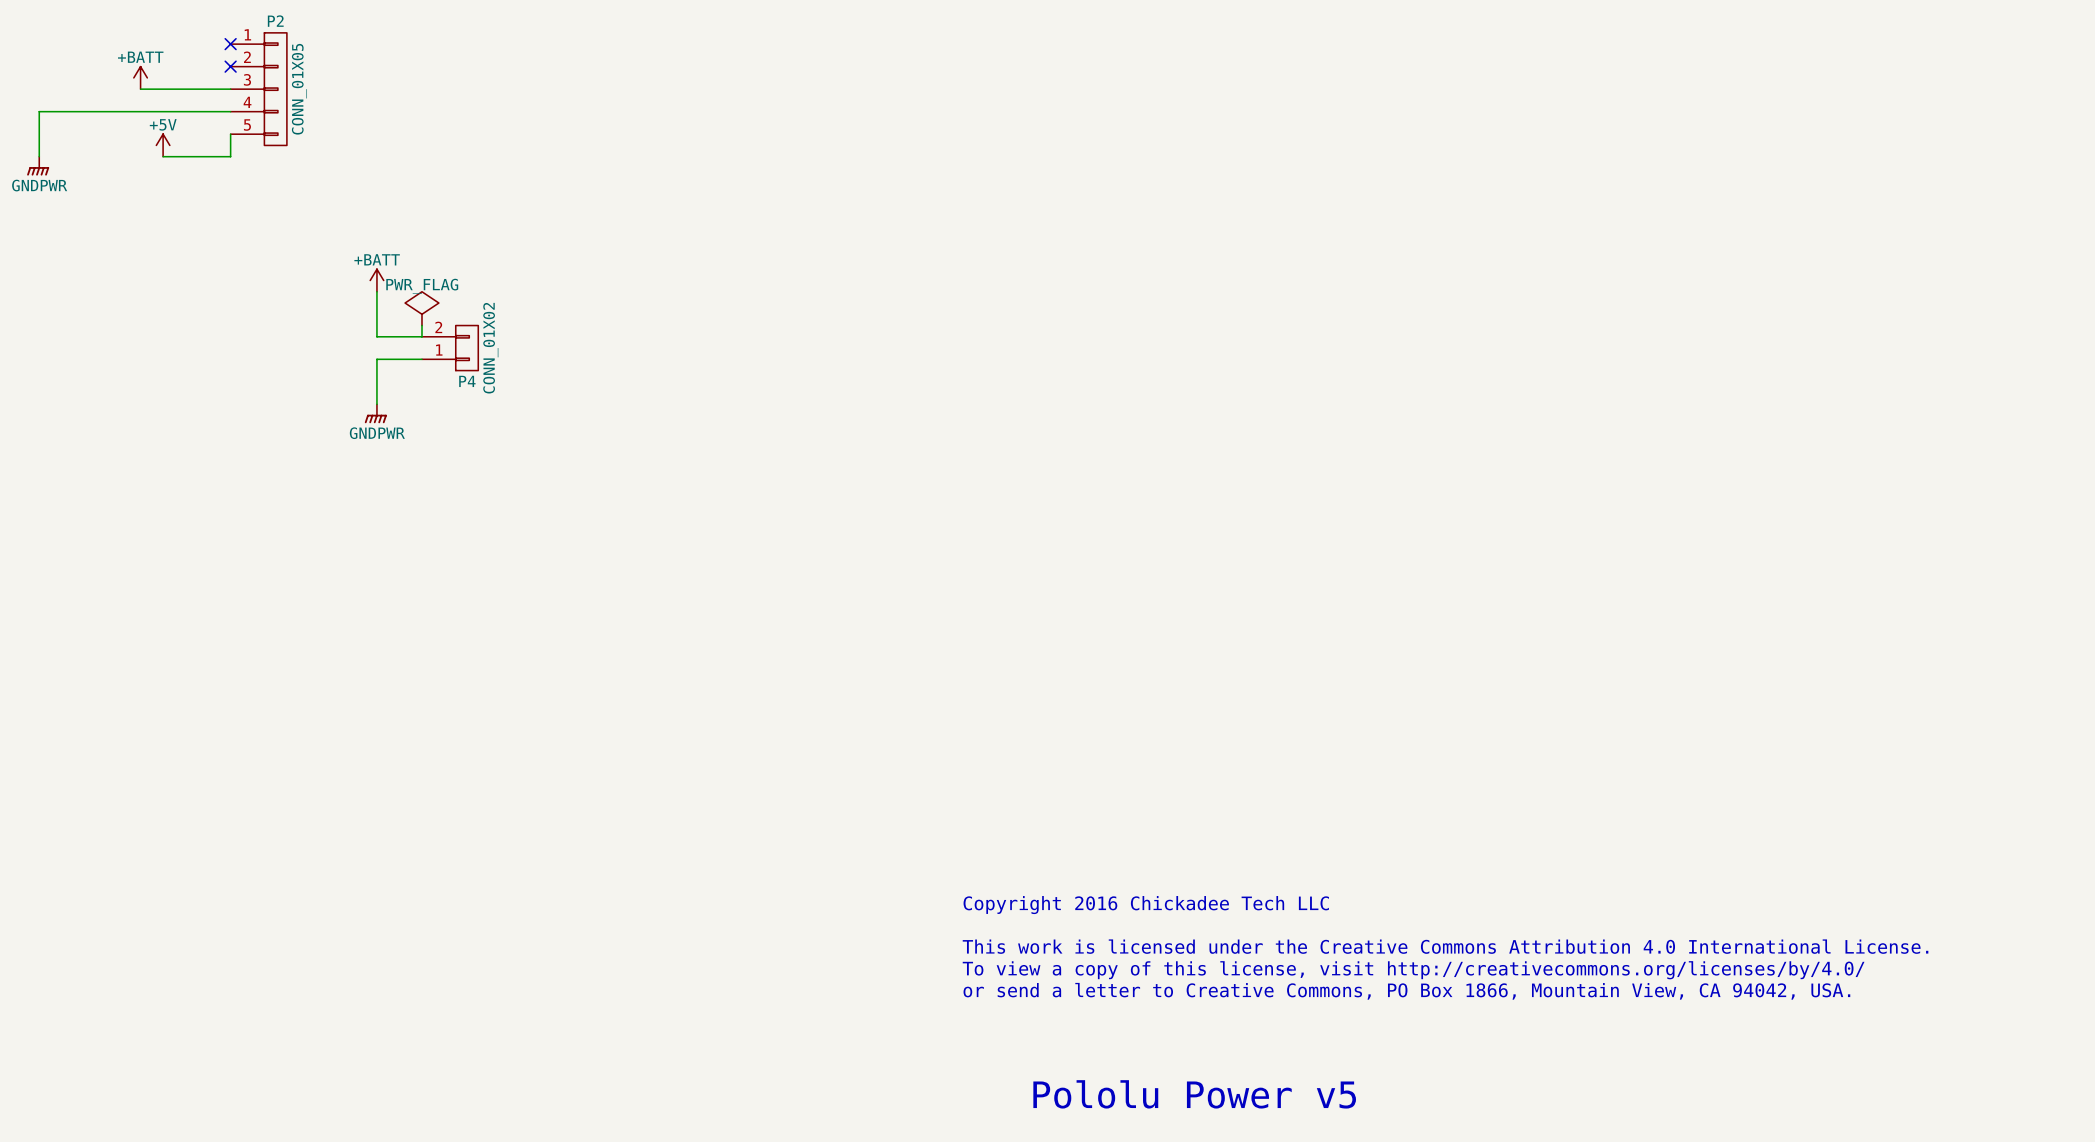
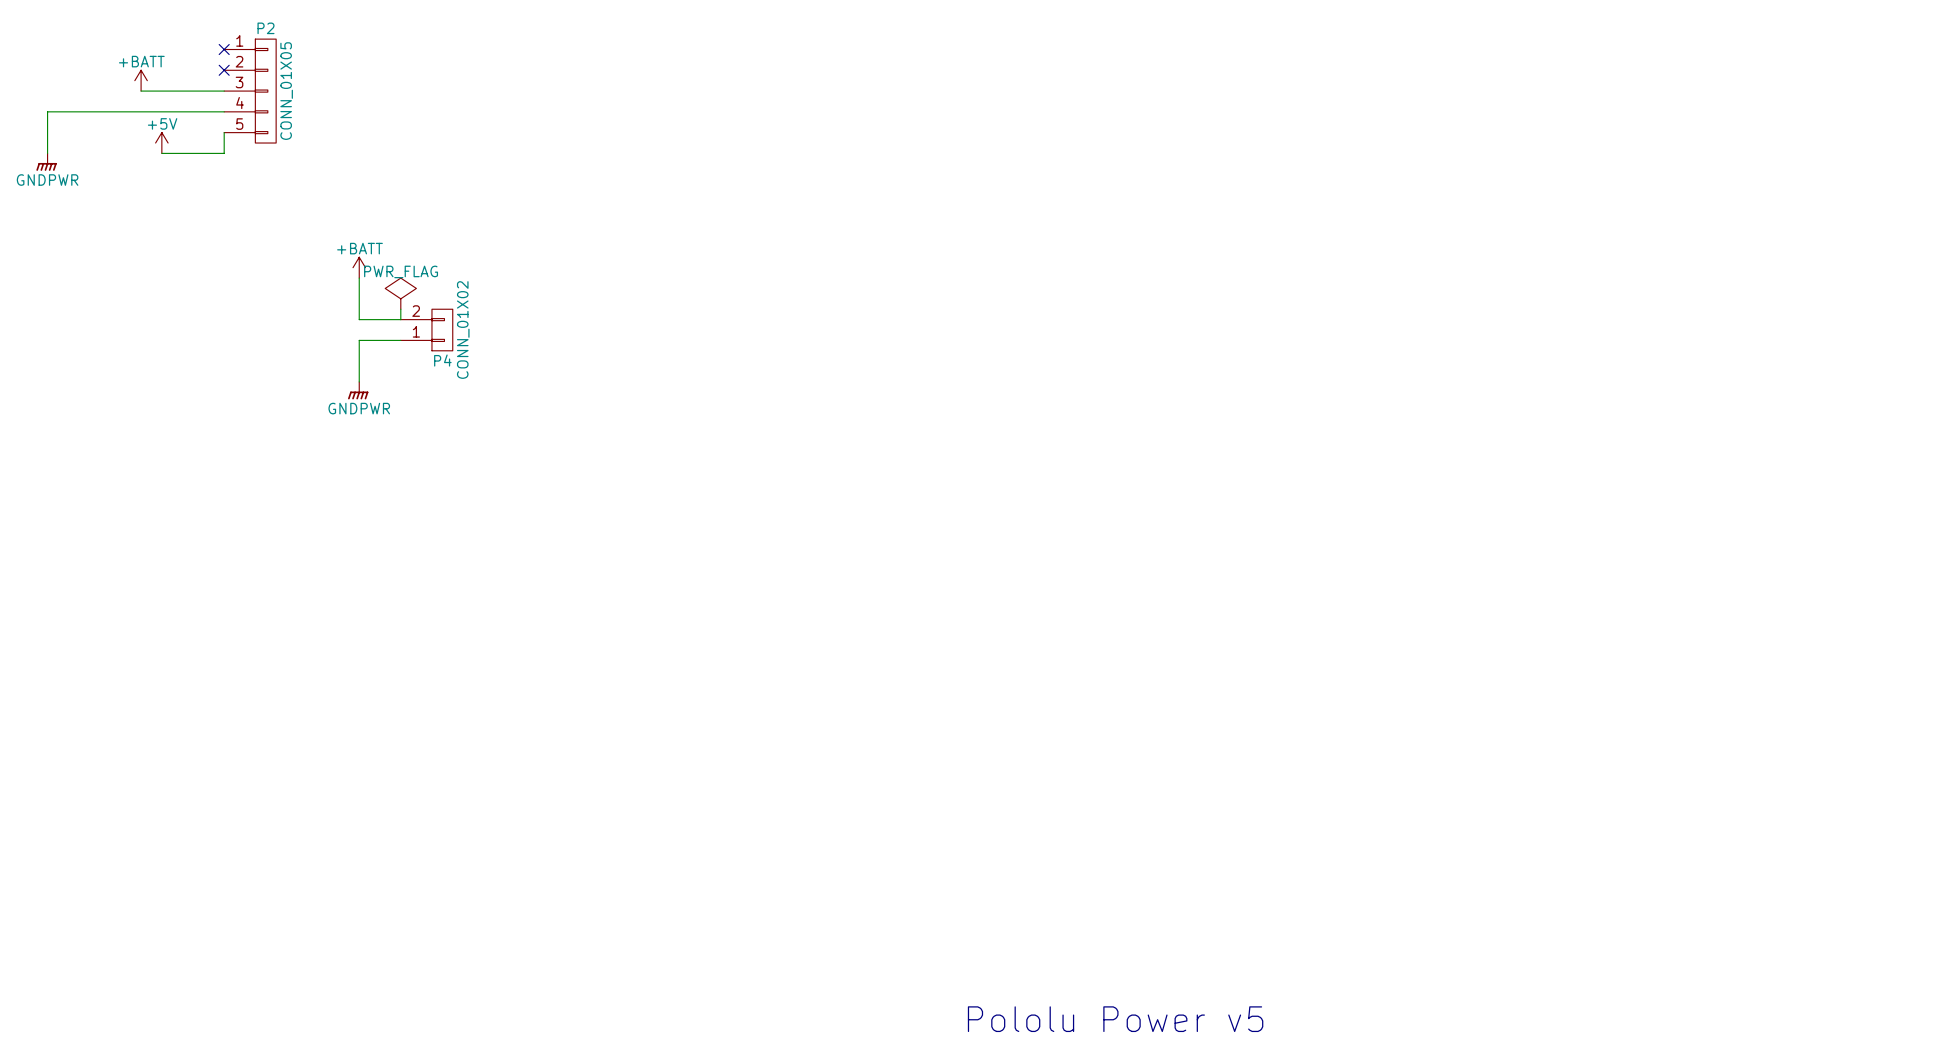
text: Copyright 2016 Chickadee Tech LLC (1146, 905) -> none
text: This work is licensed under the Creative Commons Attribution 4.0 International License. (1445, 946) -> none
text: To view a copy of this license, visit http://creativecommons.org/licenses/by/4.0/ (1413, 970) -> none
text: or send a letter to Creative Commons, PO Box 1866, Mountain View, CA 94042, USA. (1406, 991) -> none

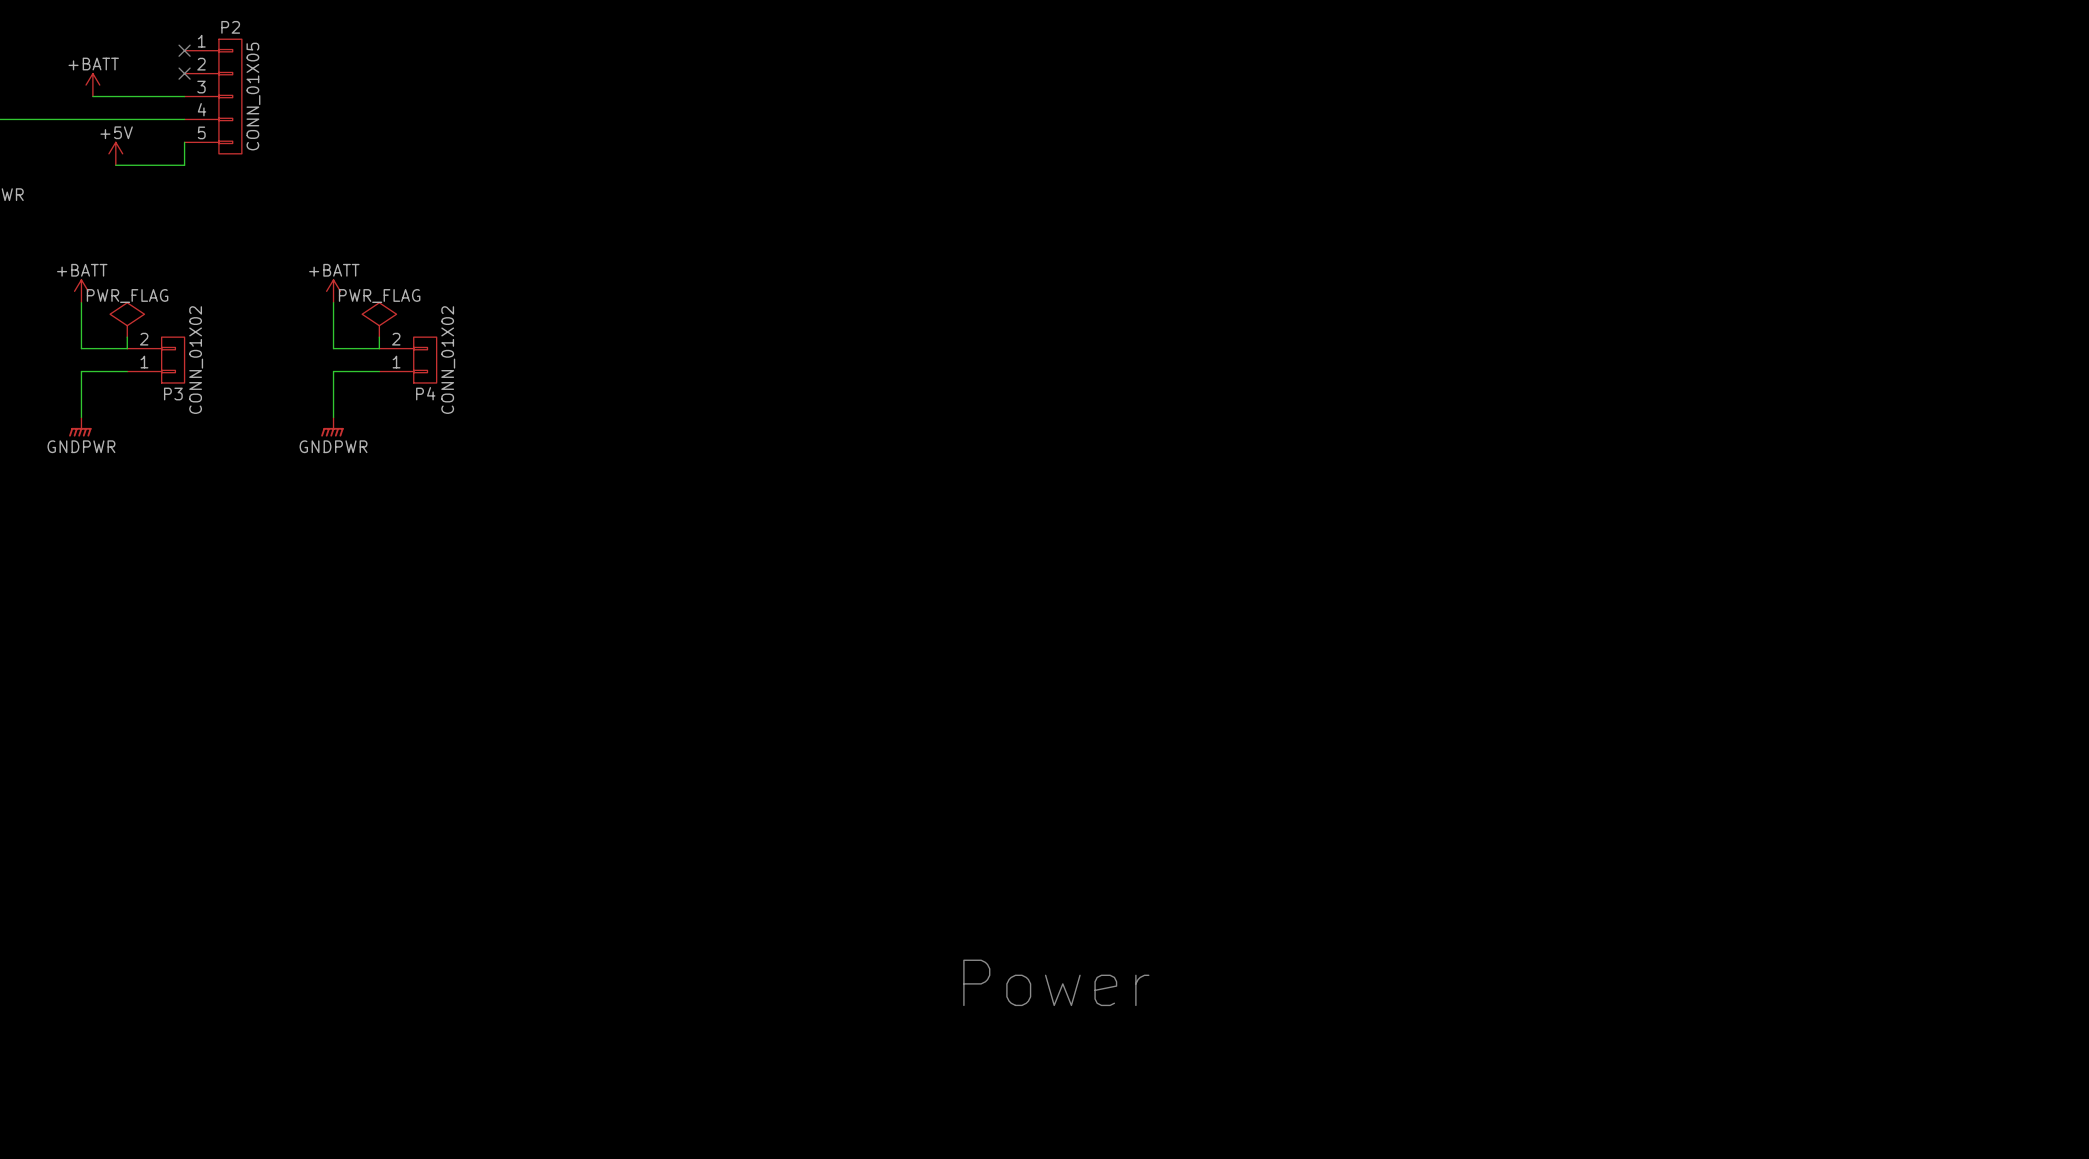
power symbol: none -> +BATT (81, 291)
wire: none -> (81, 302) (81, 348) (127, 348) (127, 337)
power symbol: none -> PWR_FLAG (127, 319)
P3: none -> CONN_01X02 (155, 360)
wire: none -> (127, 371) (81, 371) (81, 417)
power symbol: none -> GNDPWR (80, 426)
text: none -> Power (1056, 982)
text: Pololu Power v5 (1115, 1019) -> none

